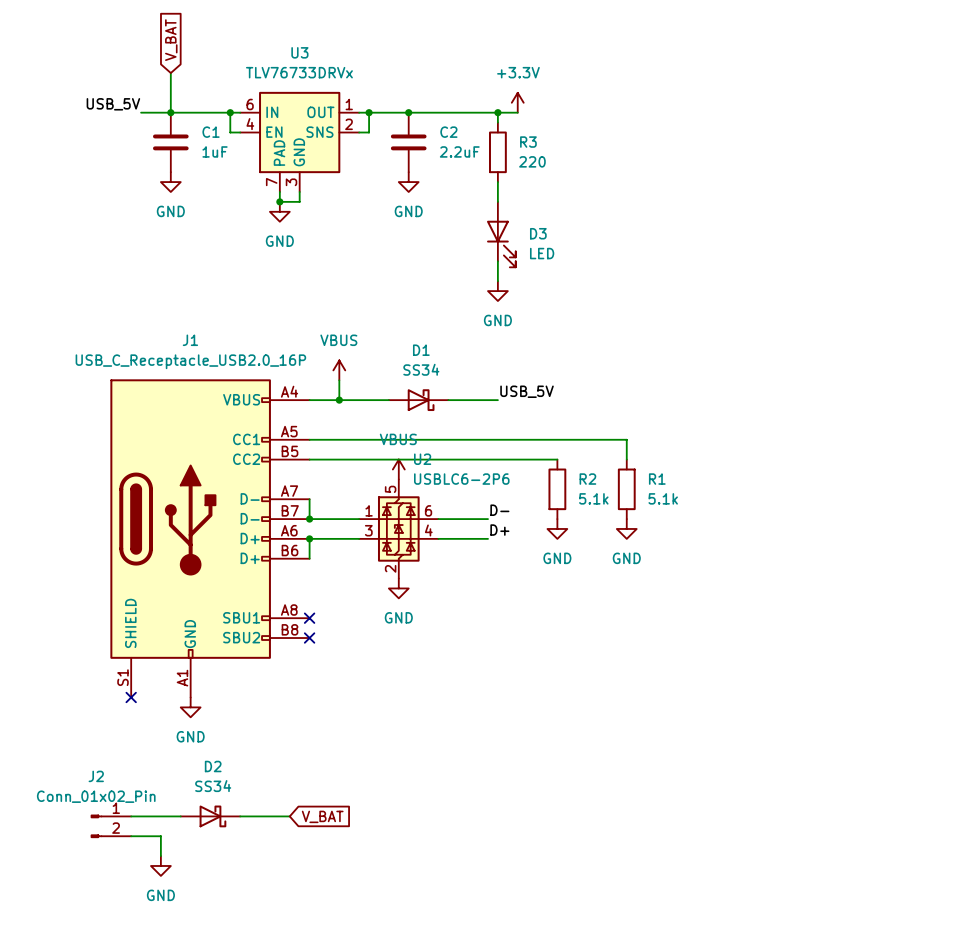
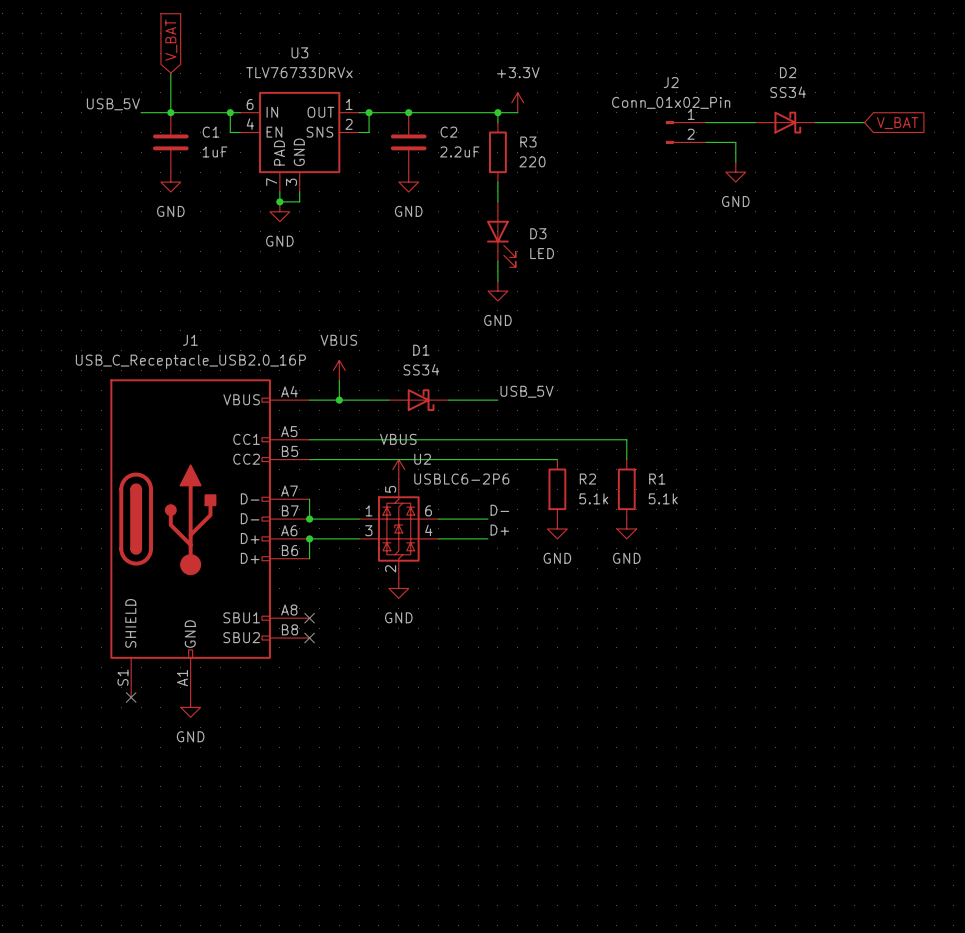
wire: none -> (706, 122) (755, 122)
wire: none -> (815, 122) (864, 122)
global label: none -> V_BAT (897, 123)
wire: none -> (706, 142) (735, 142) (735, 162)
power symbol: none -> GND (735, 172)
wire: (131, 816) (180, 816) -> none
D2 position: (210, 816) -> (785, 122)
wire: (240, 816) (289, 816) -> none
global label: V_BAT (322, 816) -> none
J2 position: (111, 826) -> (685, 132)
wire: (131, 836) (160, 836) (160, 856) -> none
power symbol: GND (160, 865) -> none

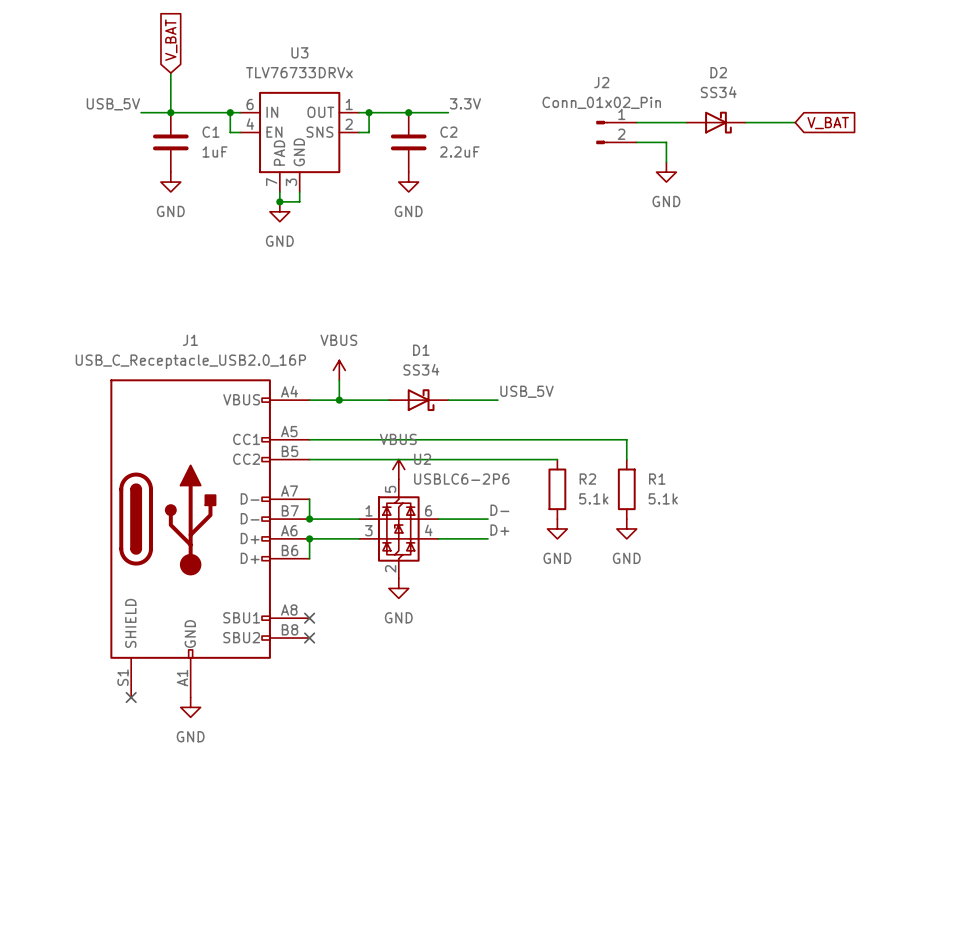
power symbol: +3.3V (517, 102) -> none
label: none -> 3.3V (465, 103)
wire: (448, 112) (517, 112) -> none
wire: (497, 112) (497, 122) -> none
junction: (497, 112) -> none
D2 position: (785, 122) -> (715, 122)
wire: (815, 122) (864, 122) -> (636, 122) (686, 122)
global label position: V_BAT (897, 123) -> V_BAT (828, 123)
J2 position: (685, 132) -> (616, 132)
wire: (706, 142) (735, 142) (735, 162) -> (636, 142) (666, 142) (666, 162)
R3: 220 (497, 152) -> none
power symbol position: GND (735, 172) -> GND (666, 172)
wire: (497, 182) (497, 201) -> none
D3: LED (501, 234) -> none
wire: (497, 261) (497, 281) -> none
power symbol: GND (497, 291) -> none

